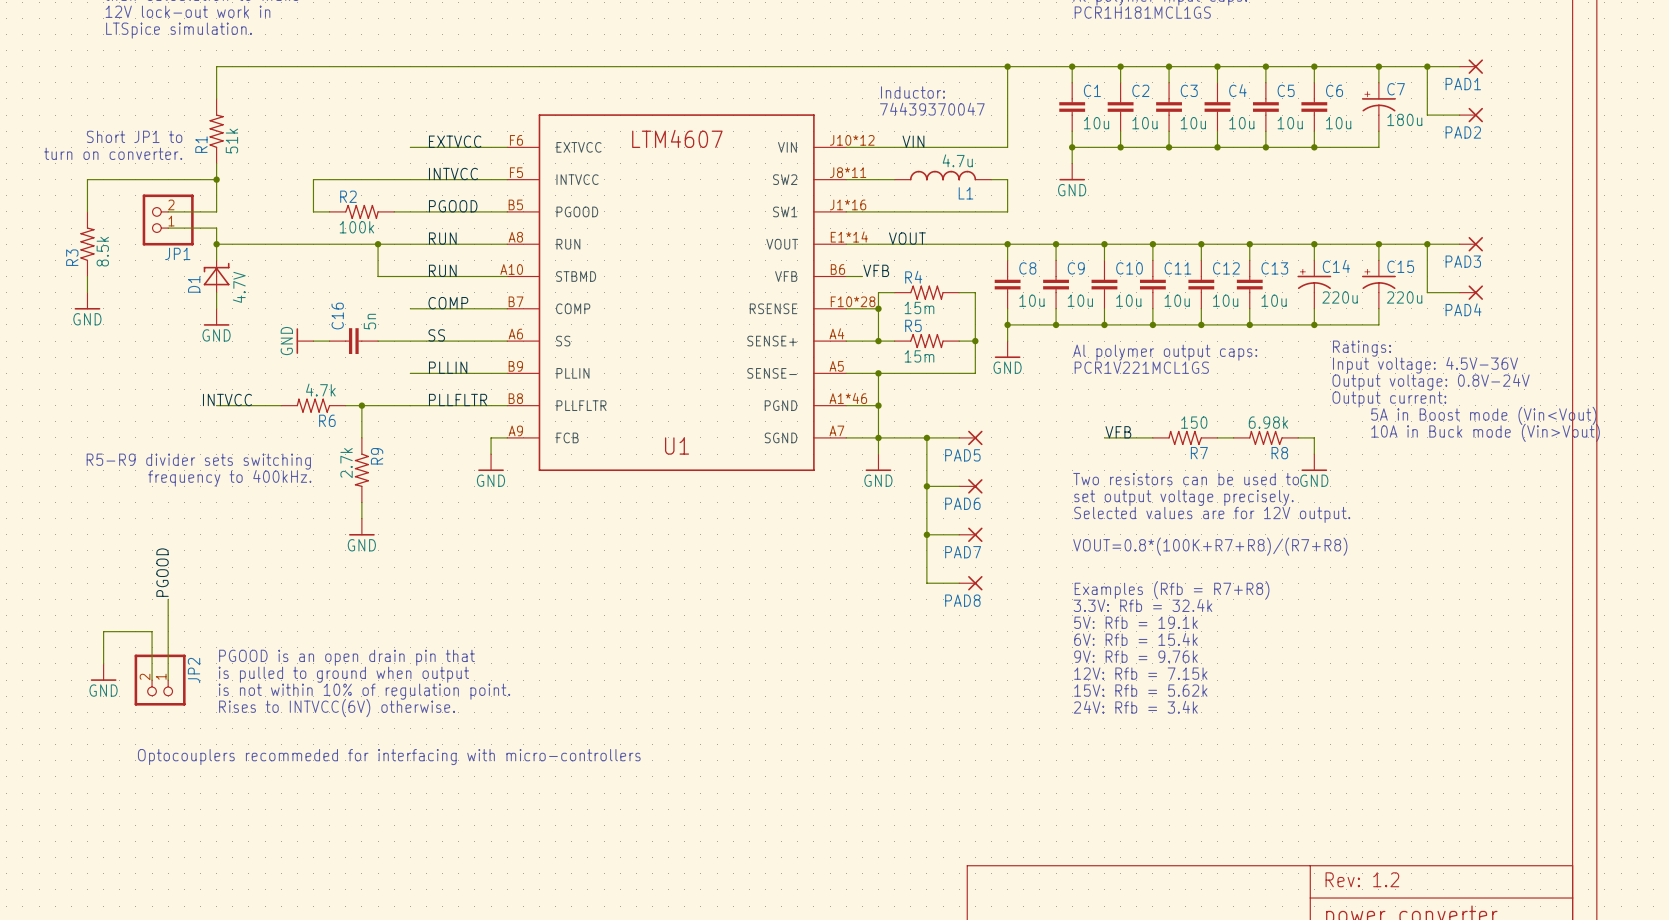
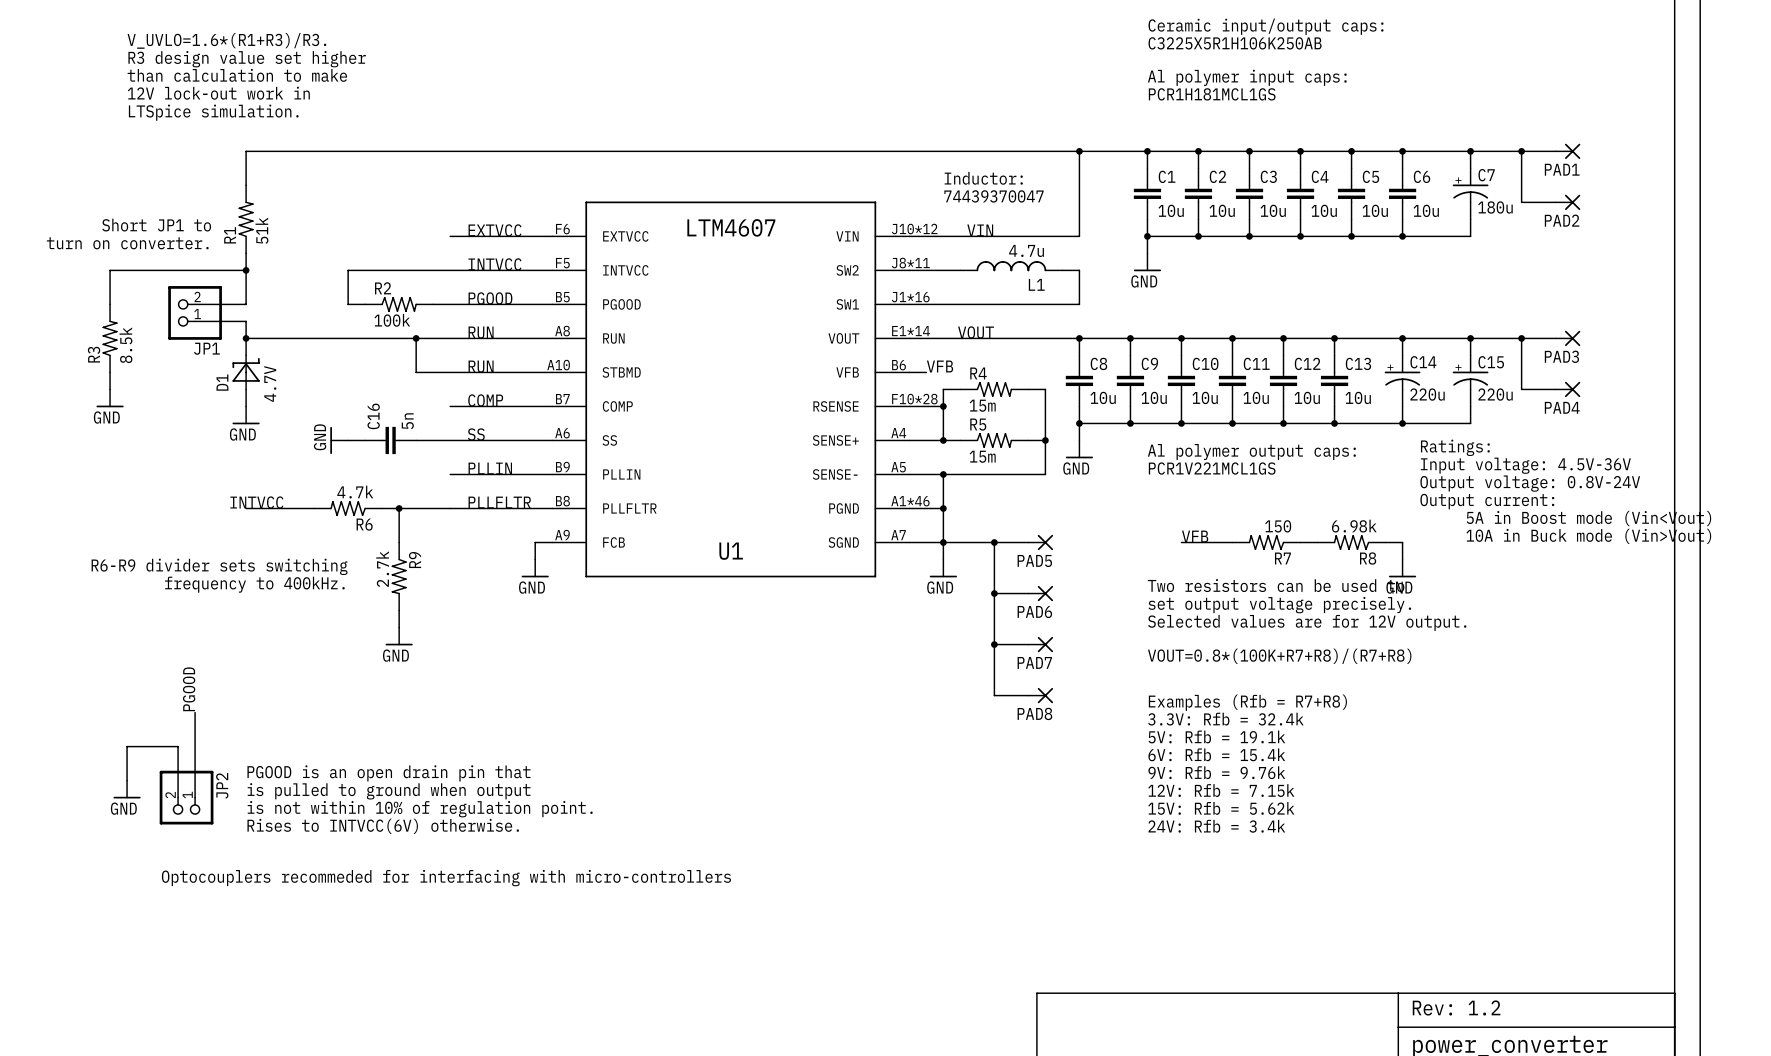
text: R5-R9 divider sets switching (198, 461) -> R6-R9 divider sets switching (219, 566)

